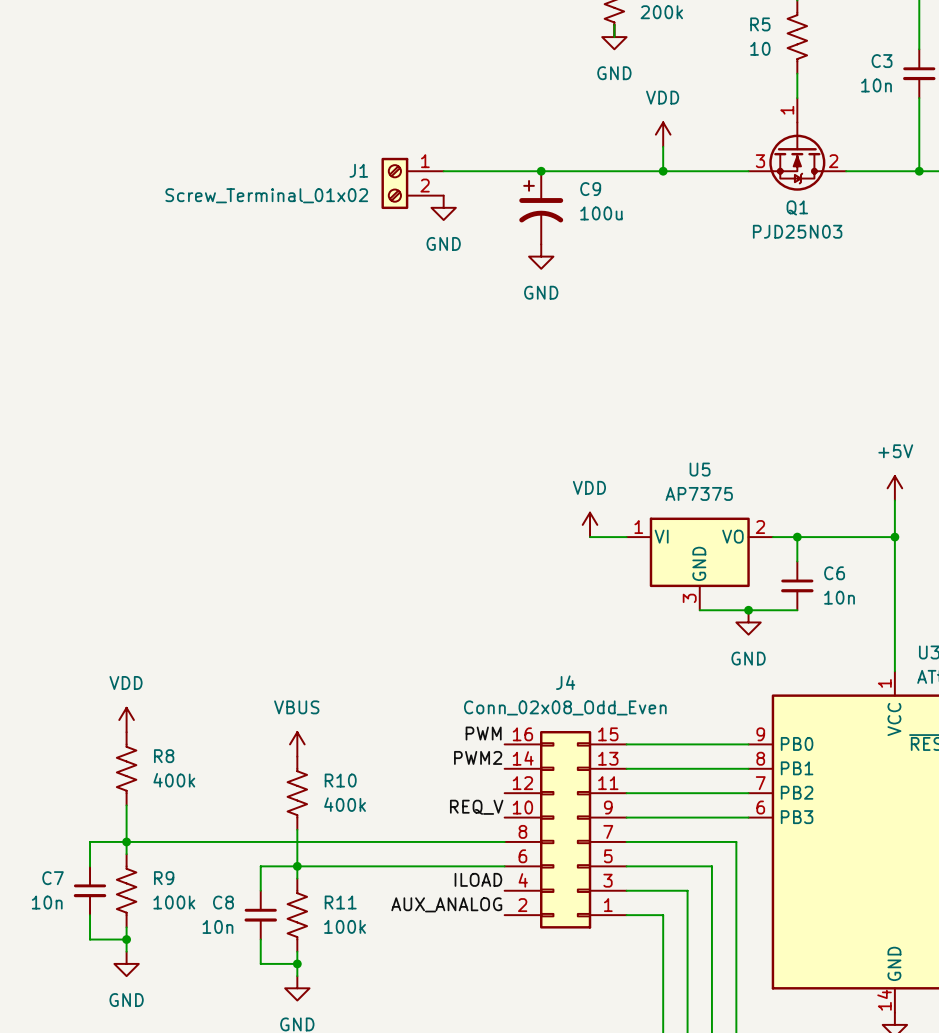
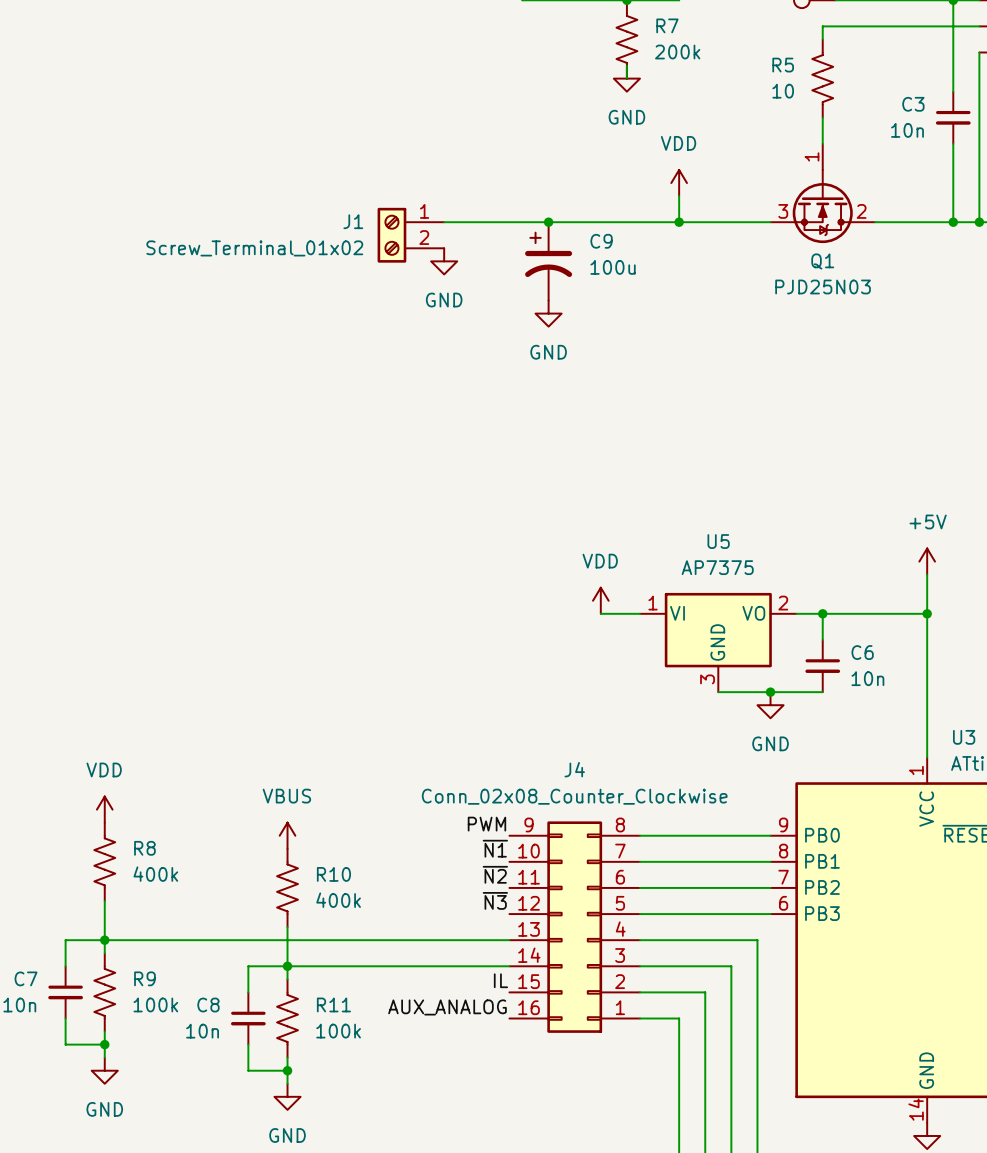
J4 value: Conn_02x08_Odd_Even (565, 707) -> Conn_02x08_Counter_Clockwise (574, 796)
J4 symbol: [504, 730, 627, 929] -> [509, 821, 640, 1033]
label: PWM2 (478, 757) -> ~{N1} (495, 848)
label: none -> ~{N2} (495, 874)
label: REQ_V (476, 807) -> ~{N3} (495, 900)
label: ILOAD (478, 879) -> IL (500, 980)

